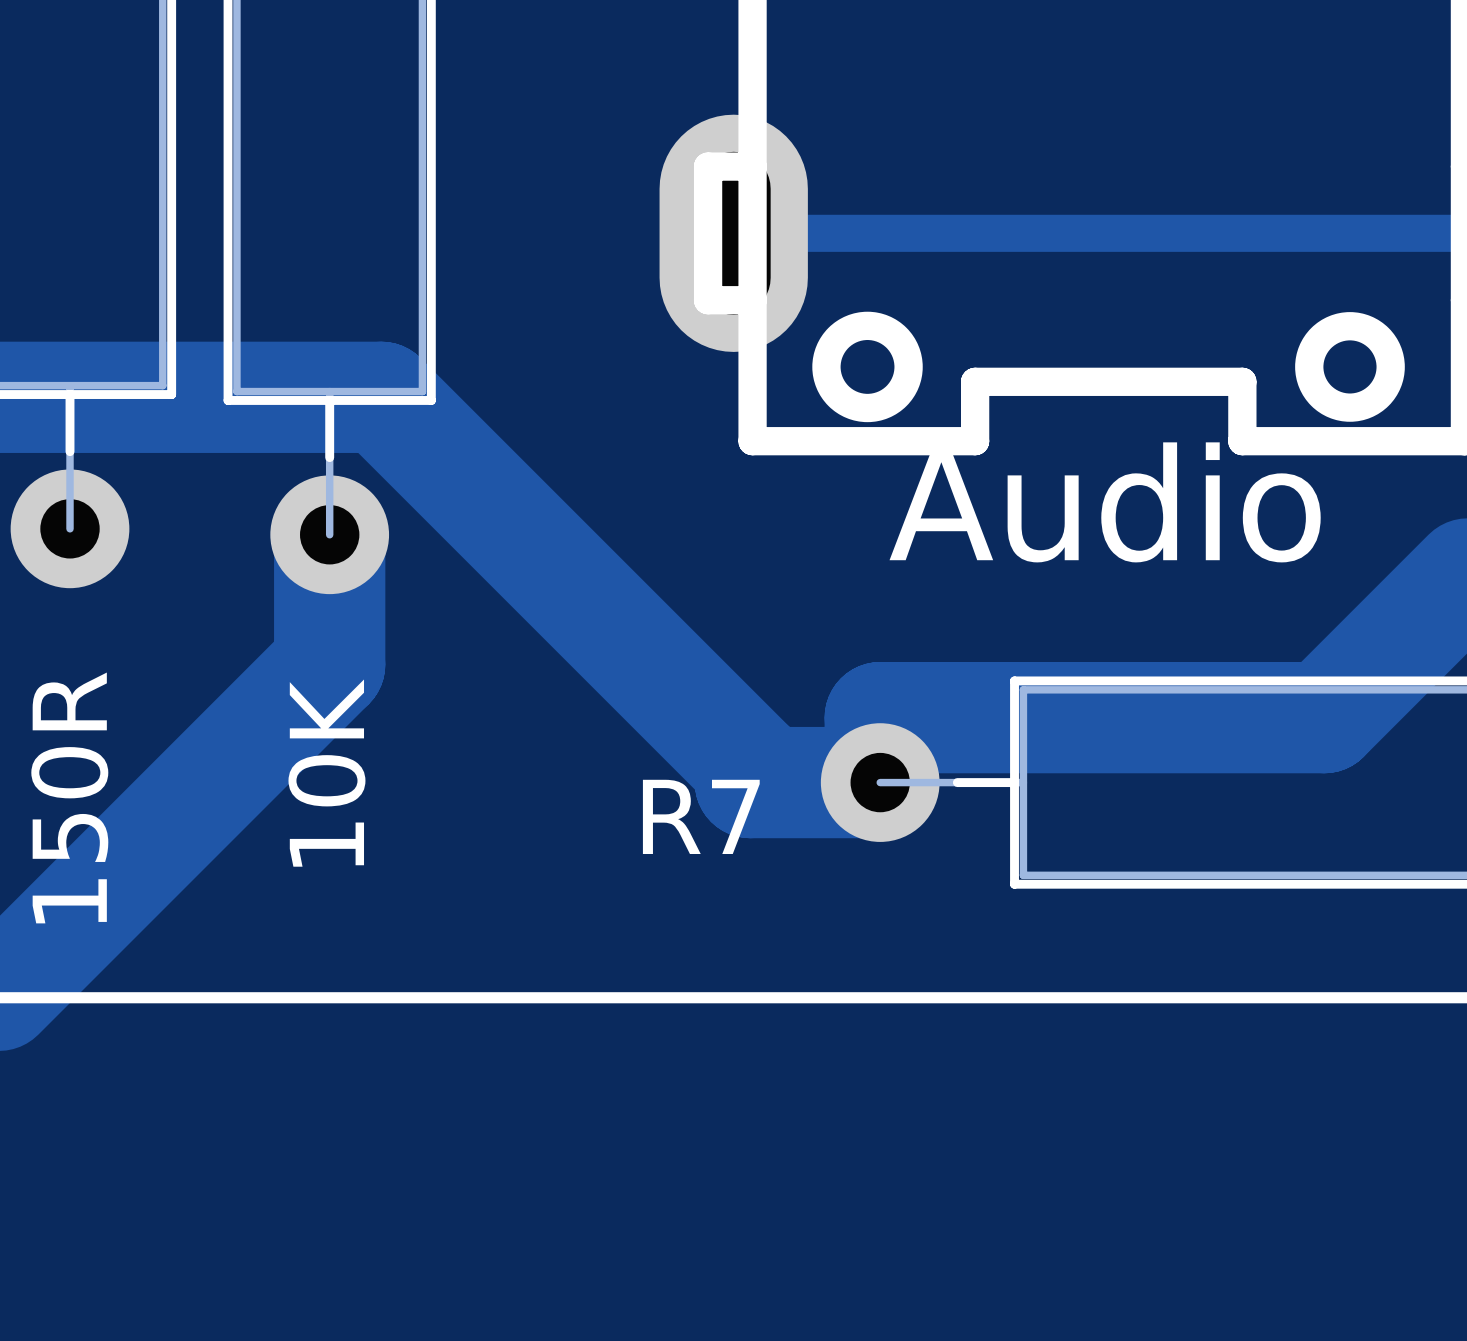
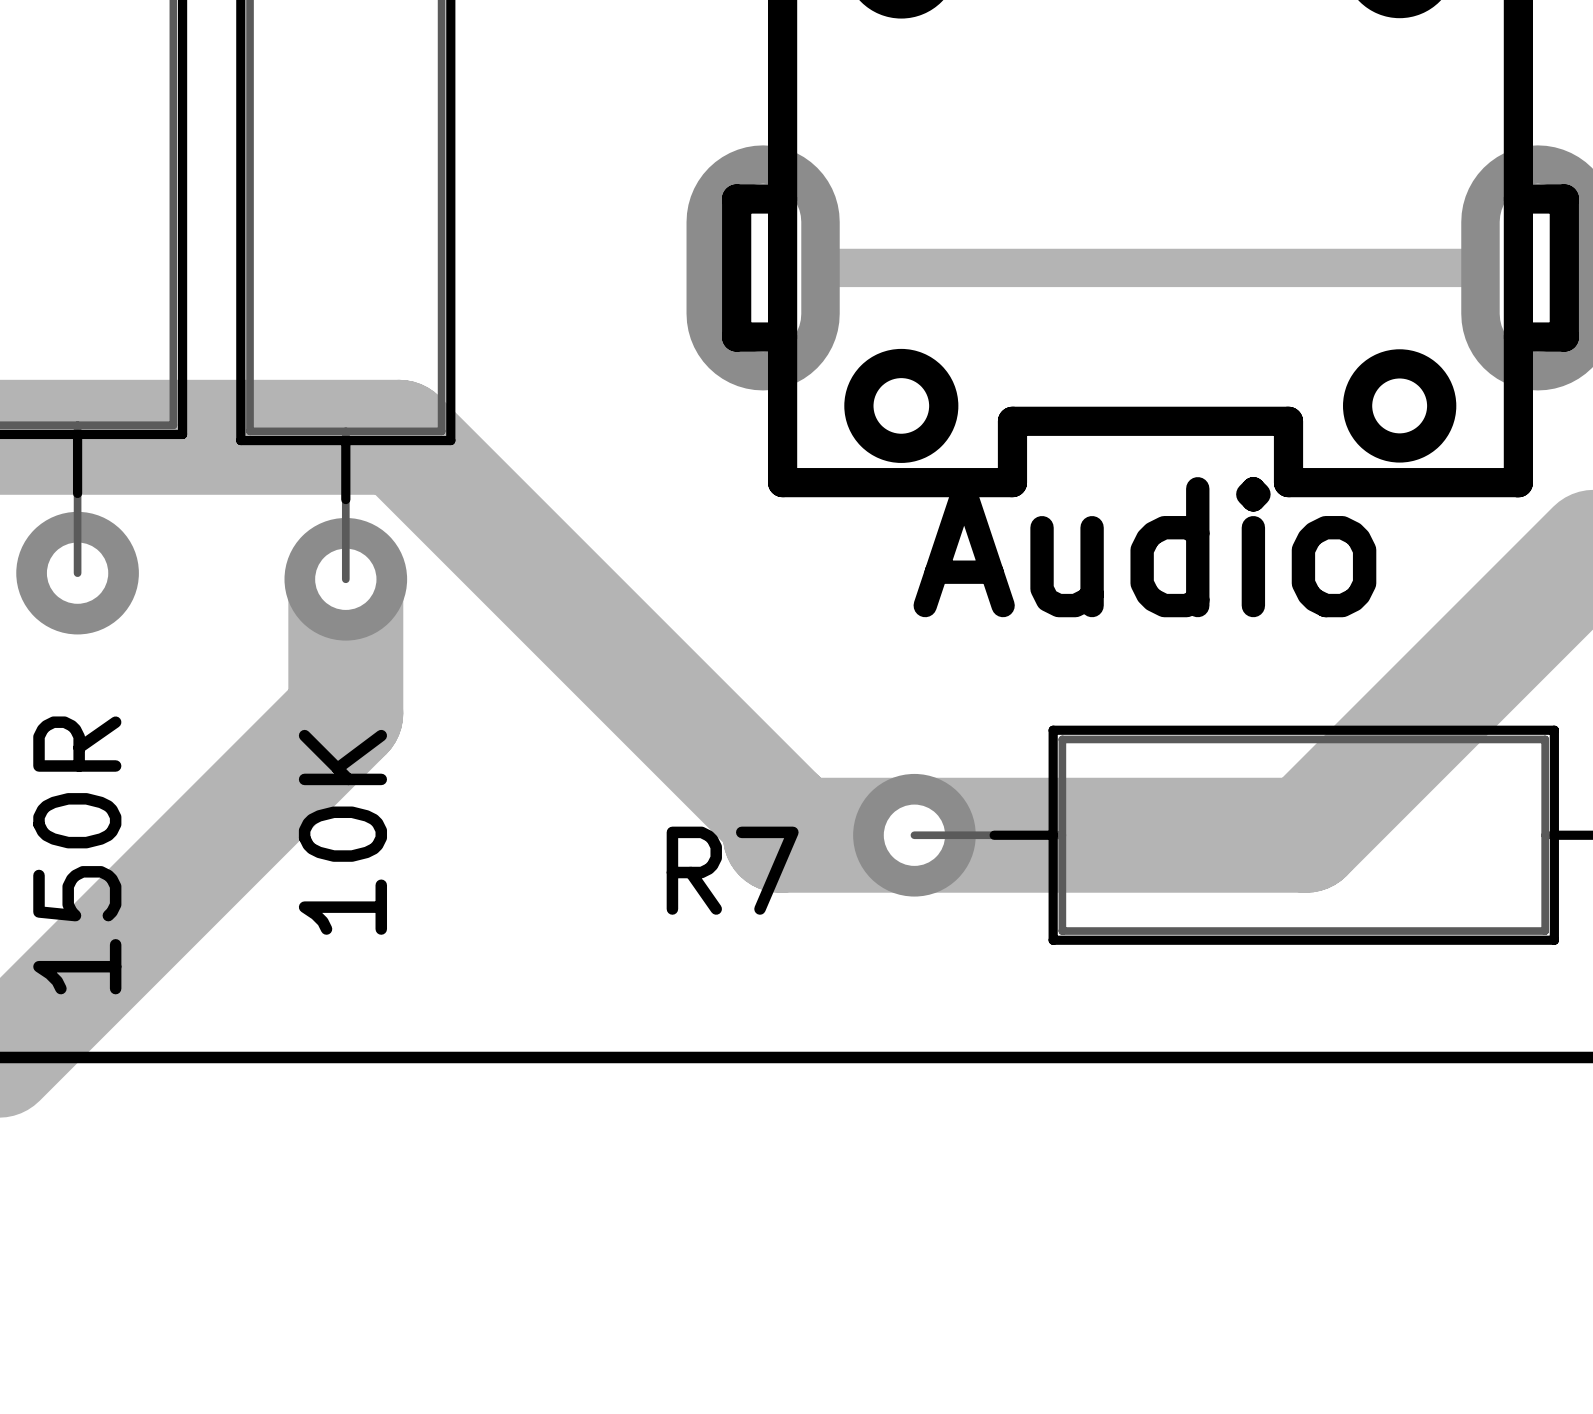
track: (1324, 717) (880, 717) (880, 782) -> (1373, 768) (1306, 835) (914, 835)

